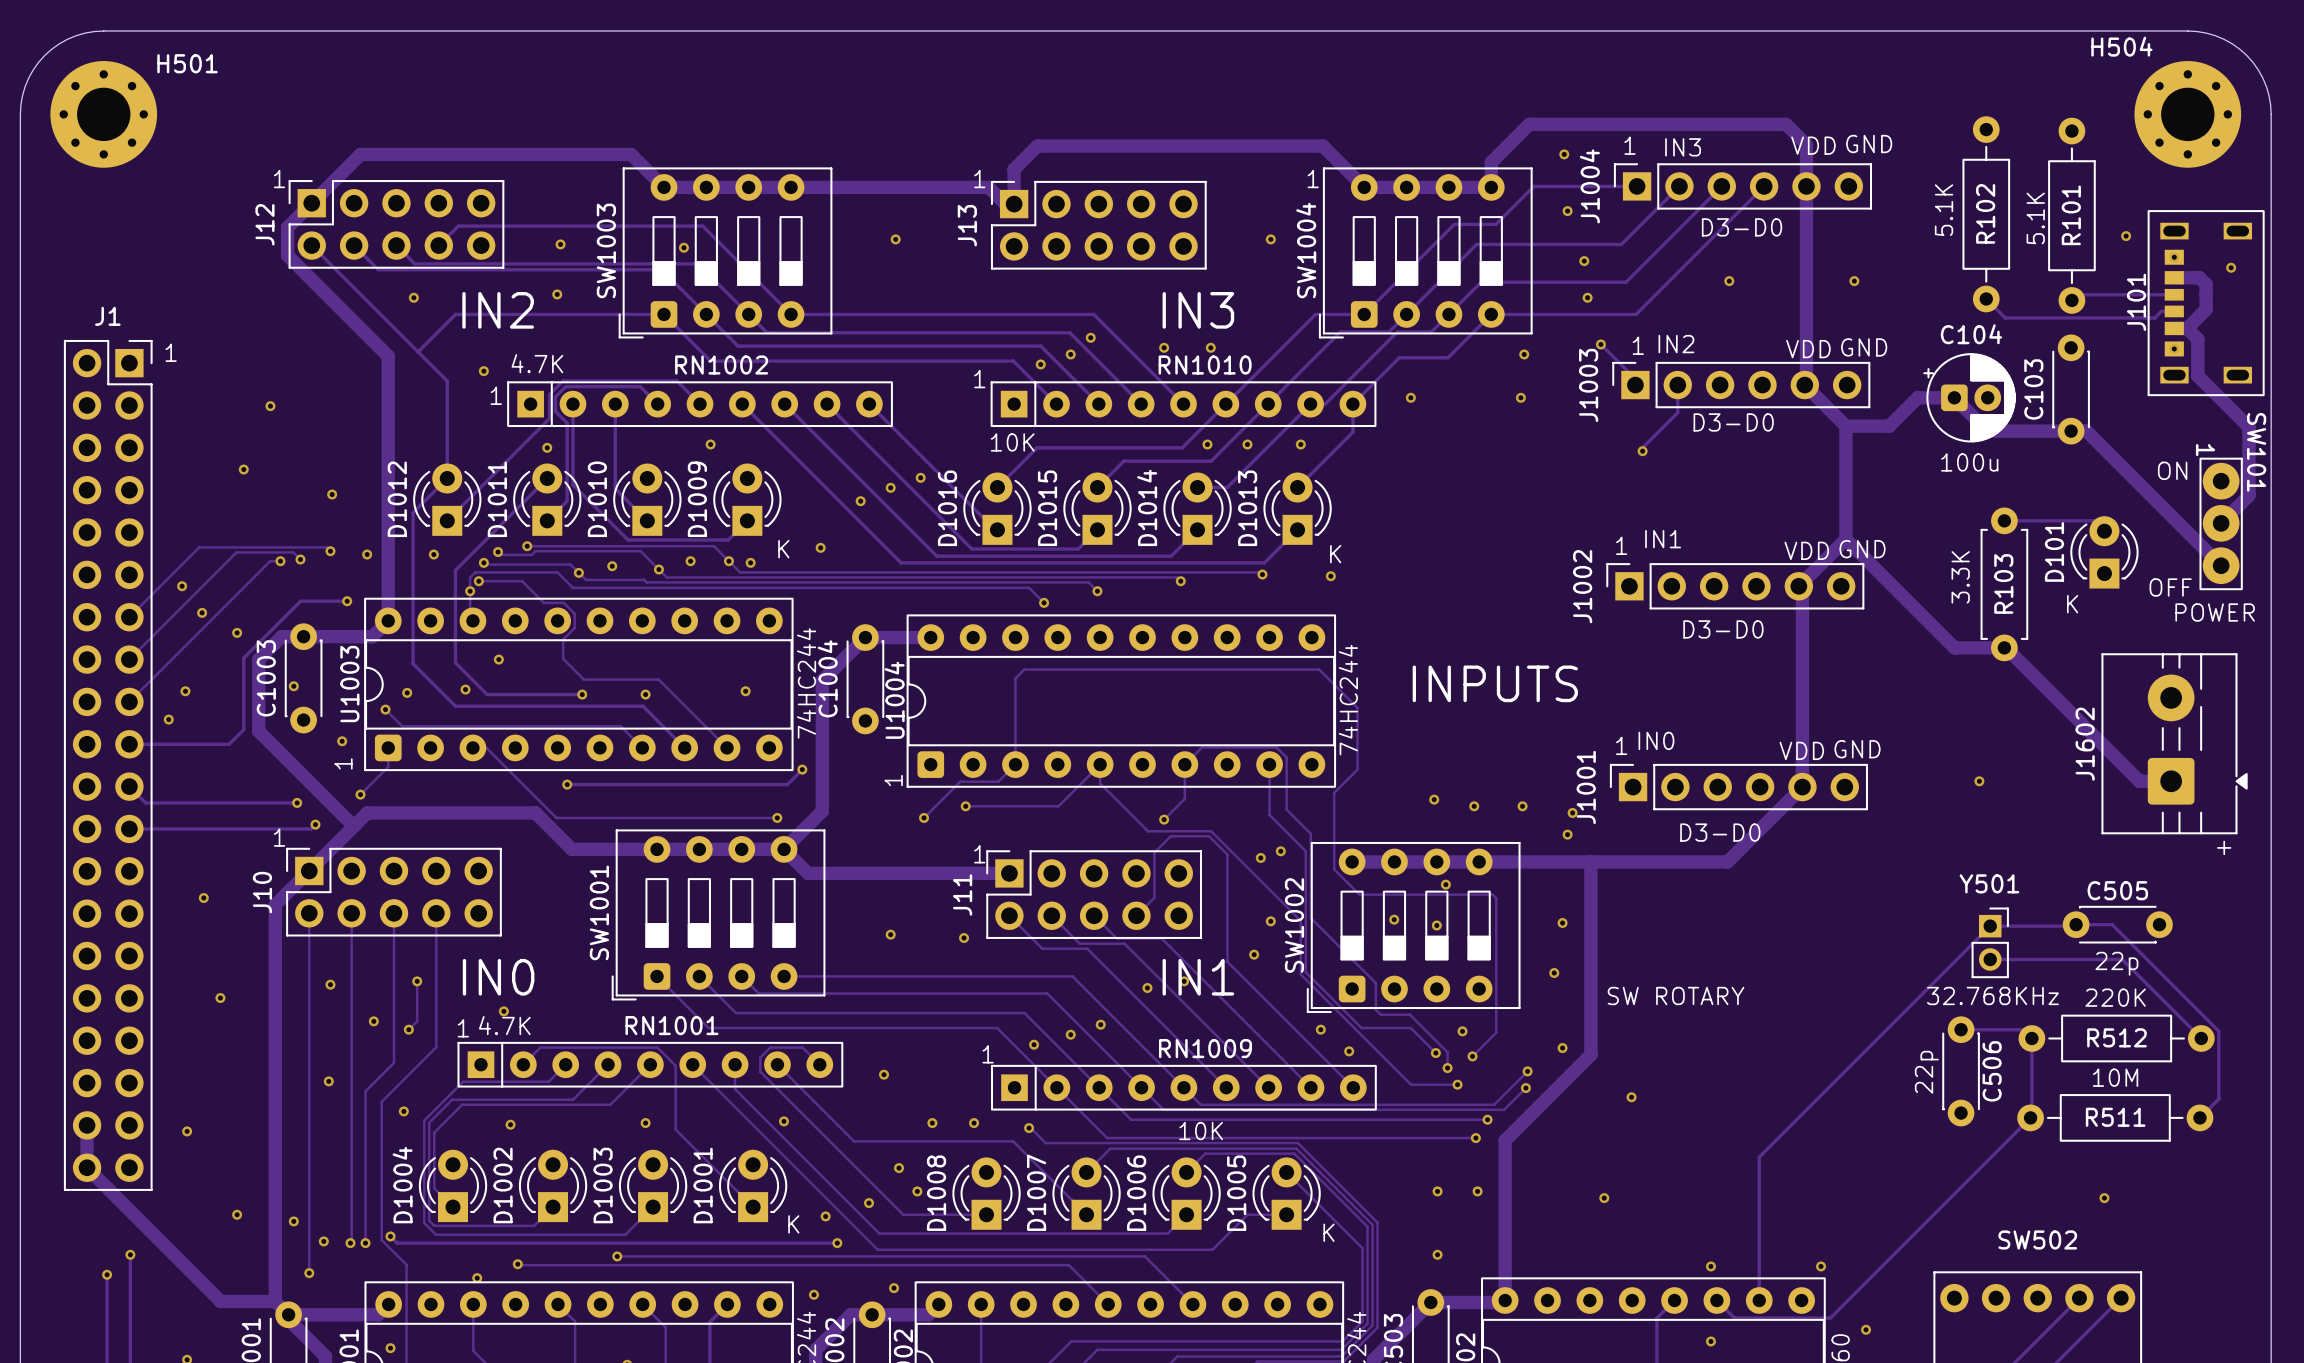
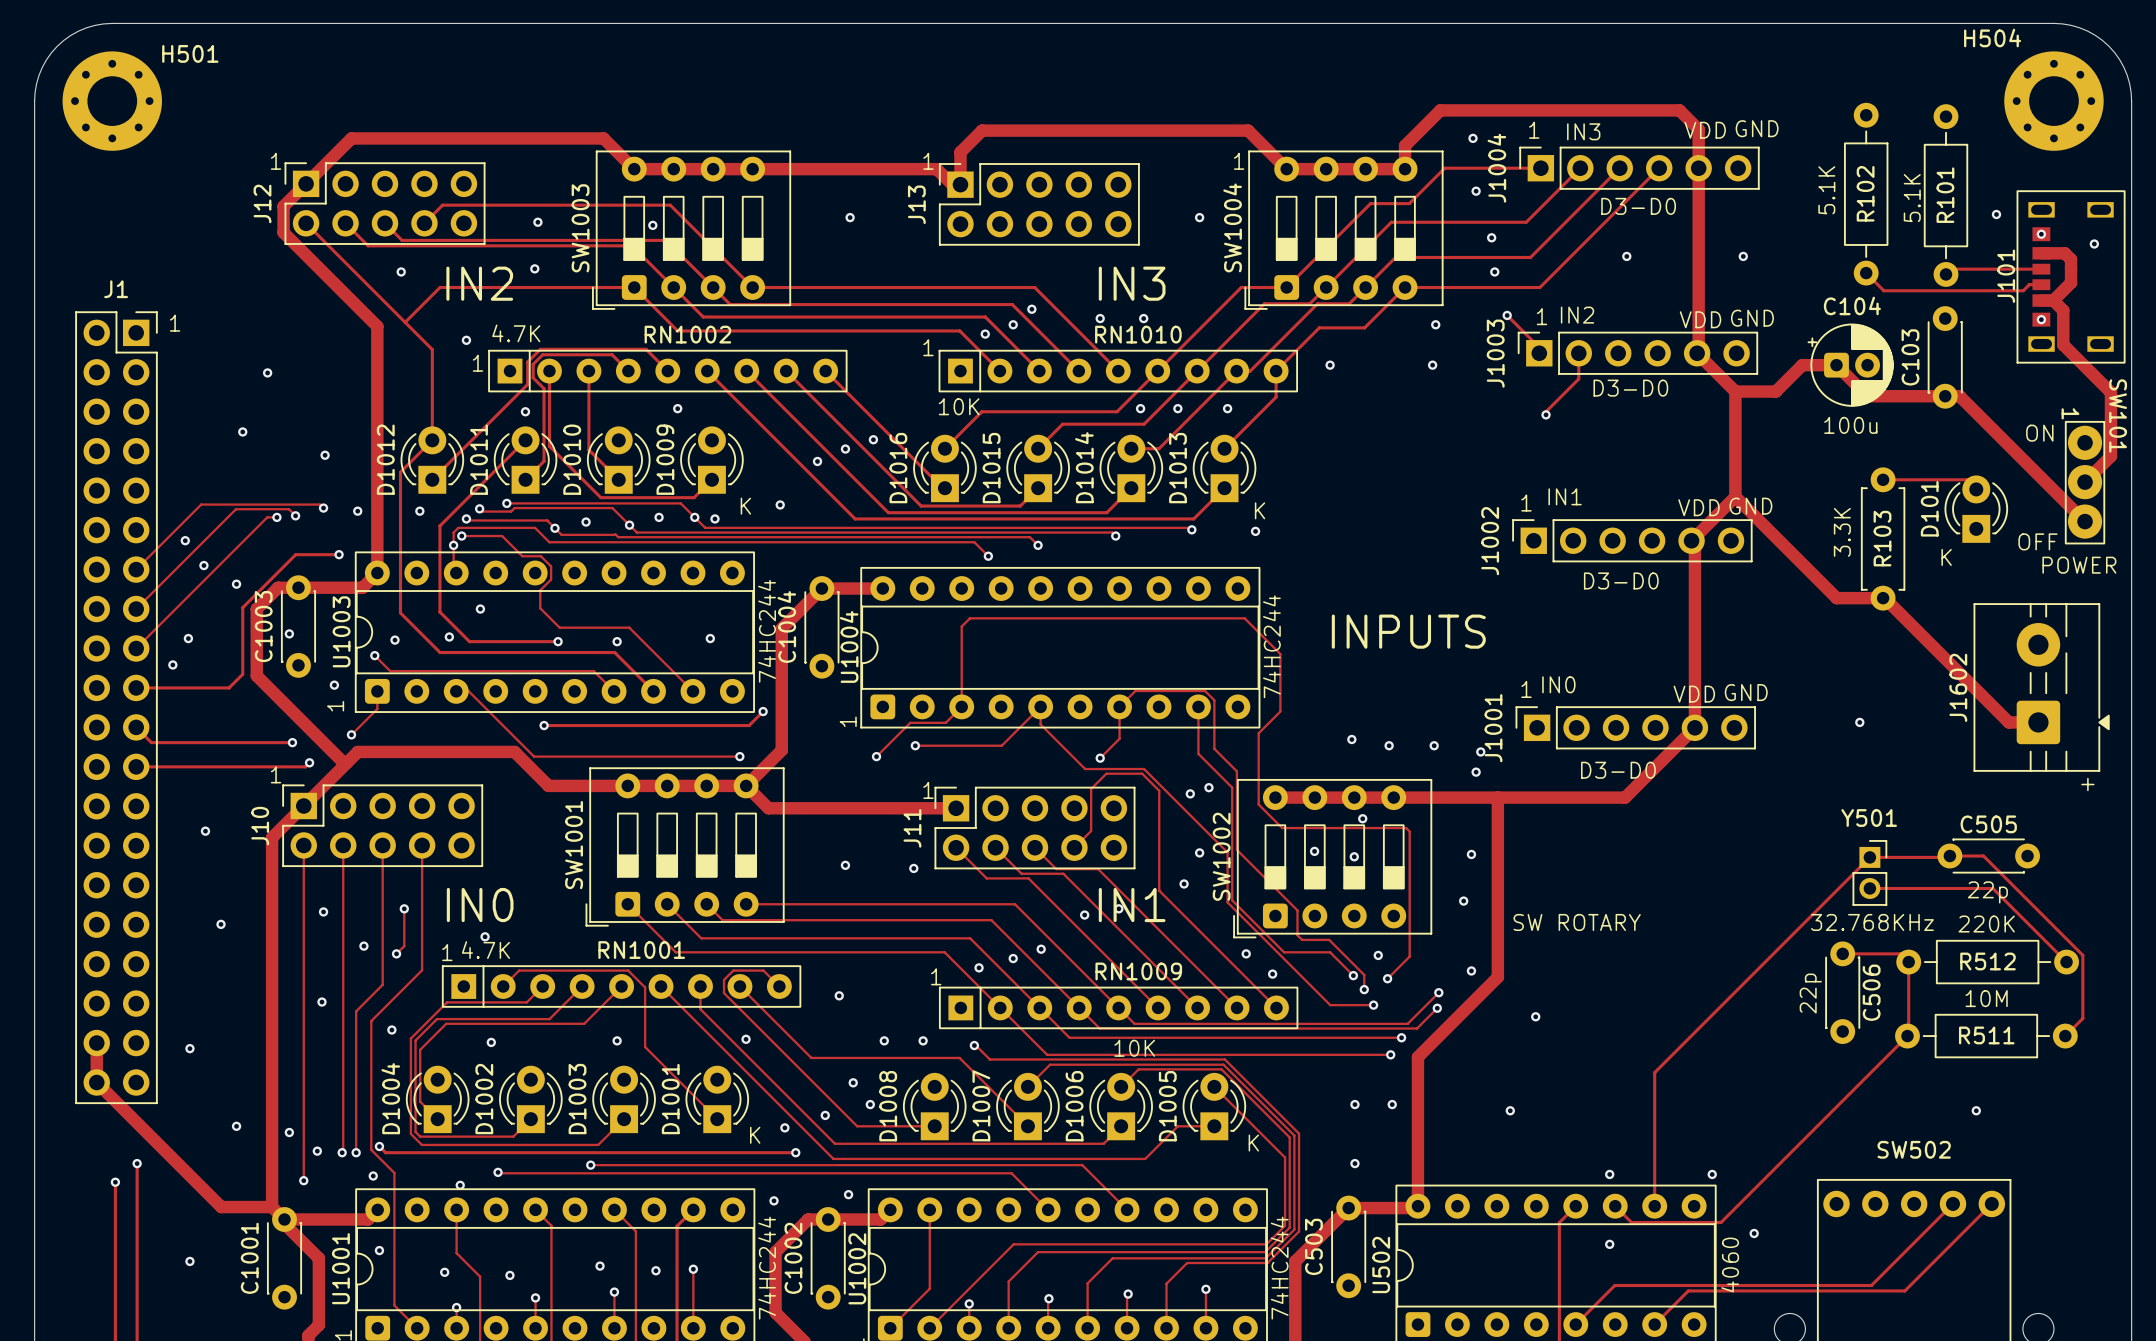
via: none -> (373, 1176)

